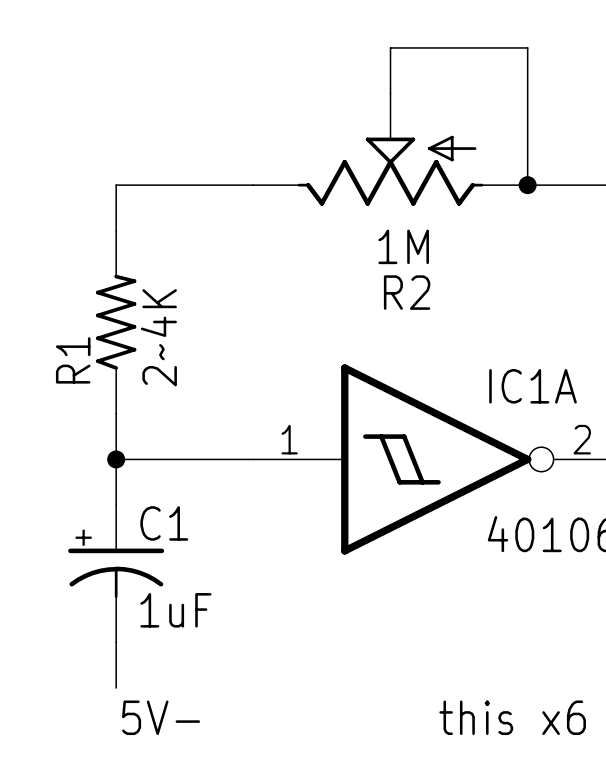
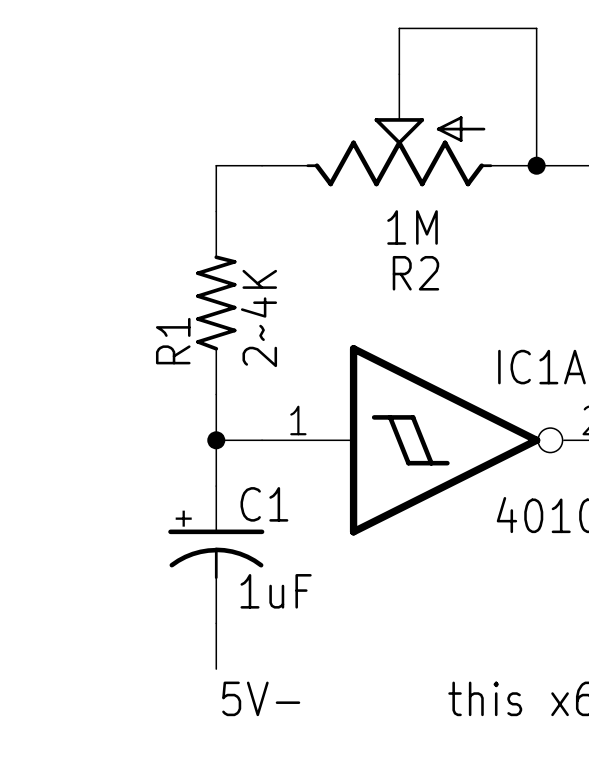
wire: (207, 185) (116, 185) (116, 230) -> (216, 165) (216, 211)
R1 position: (116, 322) -> (216, 303)
wire: (116, 413) (116, 505) -> (216, 394) (216, 486)
wire: (116, 459) (207, 459) -> none
junction position: (116, 459) -> (216, 440)
C1 position: (116, 573) -> (216, 554)
wire: (116, 642) (116, 688) -> (216, 623) (216, 669)
label position: 5V- (161, 717) -> 5V- (261, 698)

